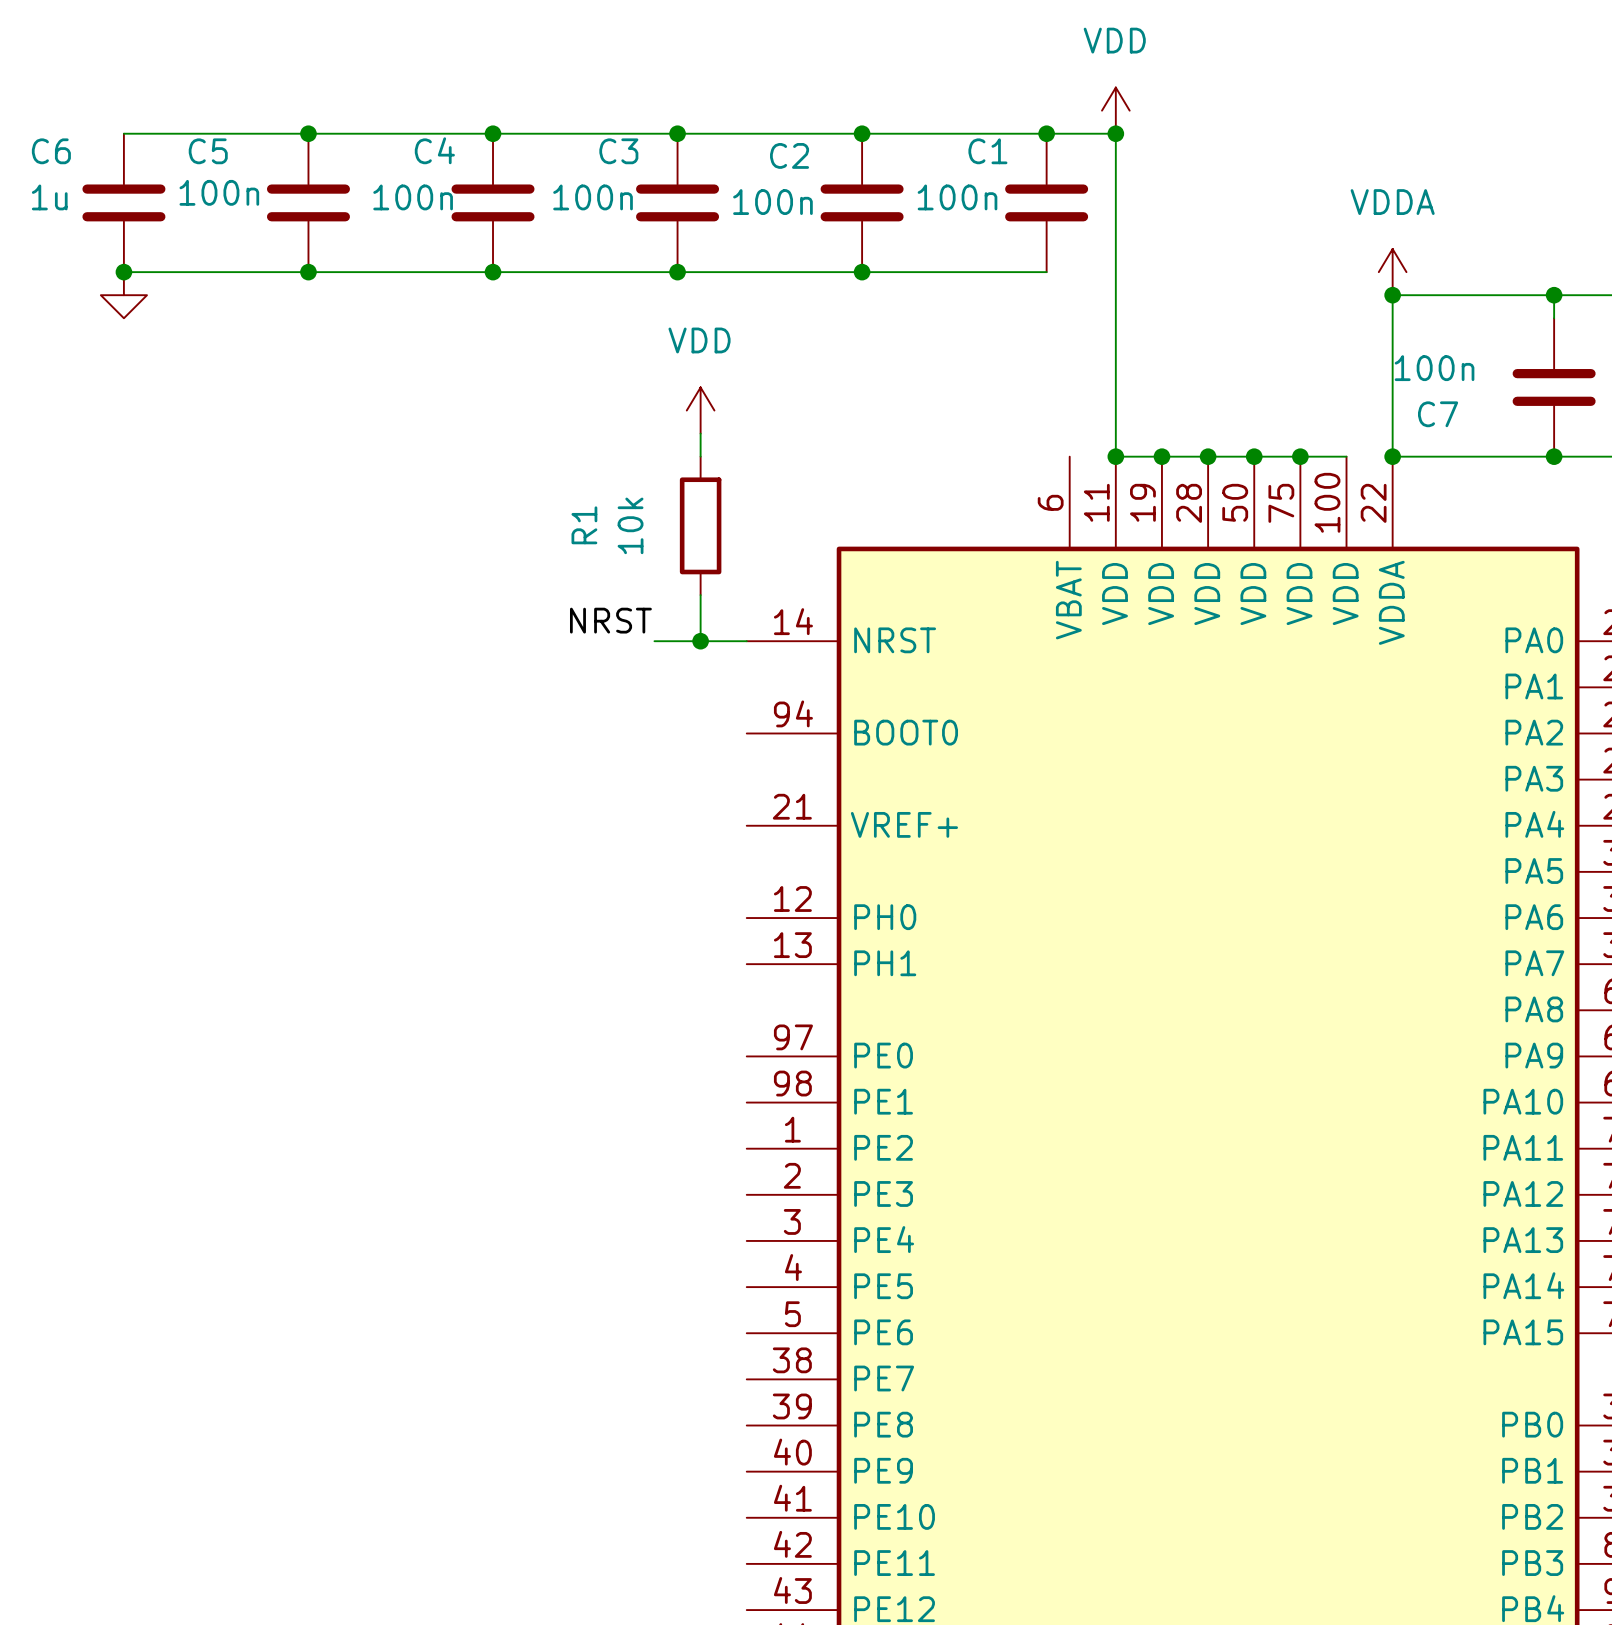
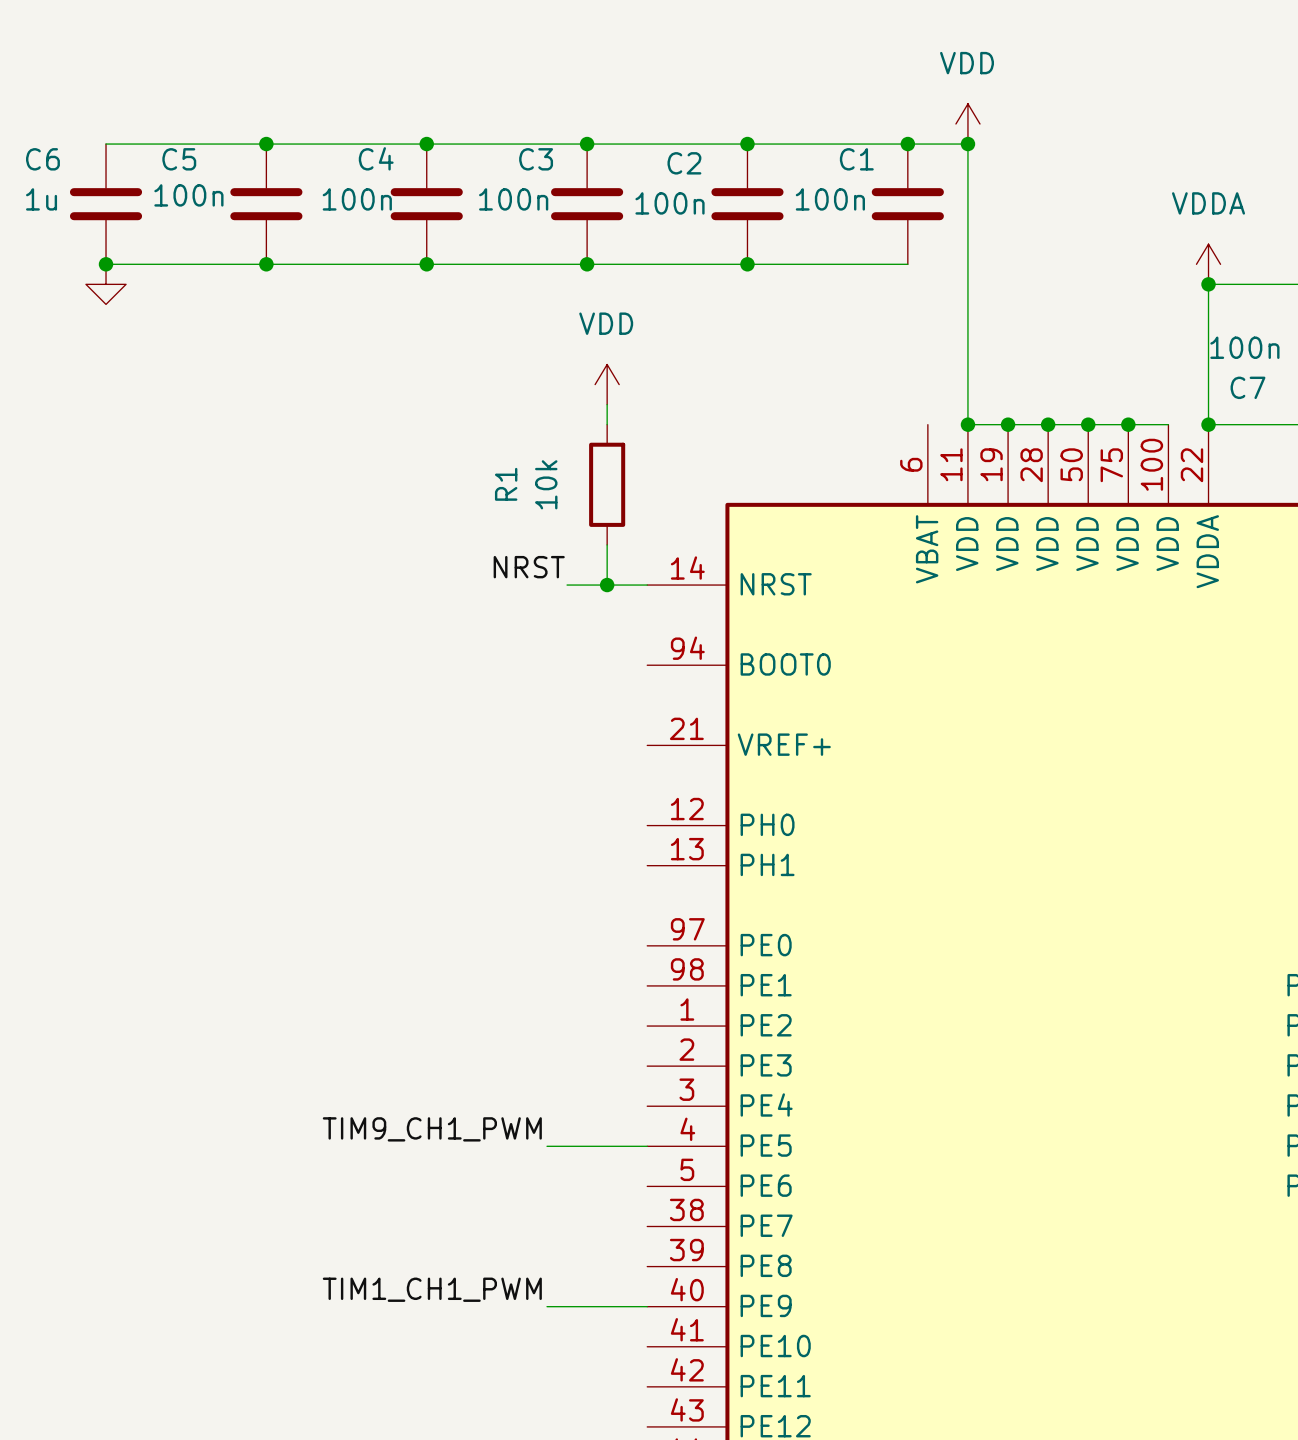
label: none -> TIM9_CH1_PWM (432, 1129)
wire: none -> (547, 1146) (647, 1146)
label: none -> TIM1_CH1_PWM (432, 1289)
wire: none -> (547, 1306) (647, 1306)

